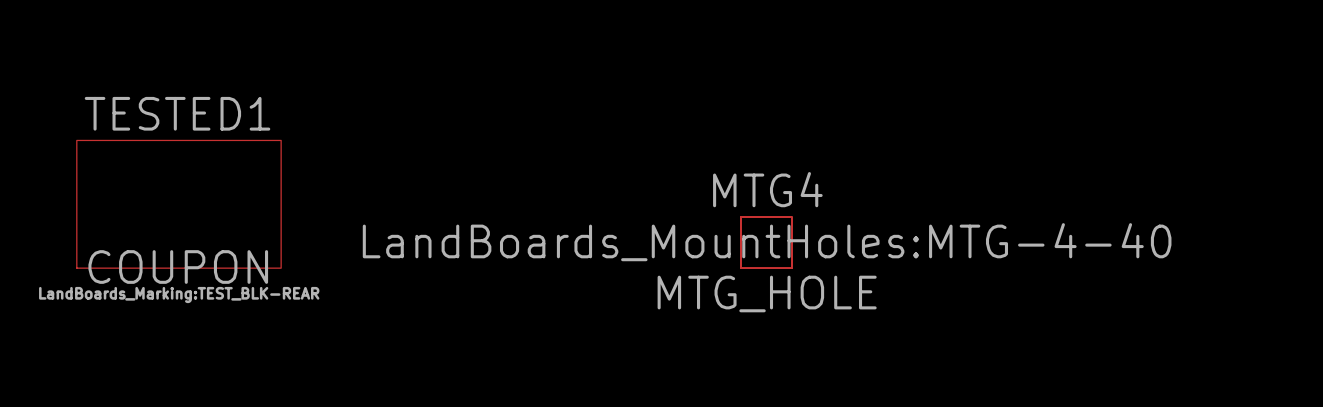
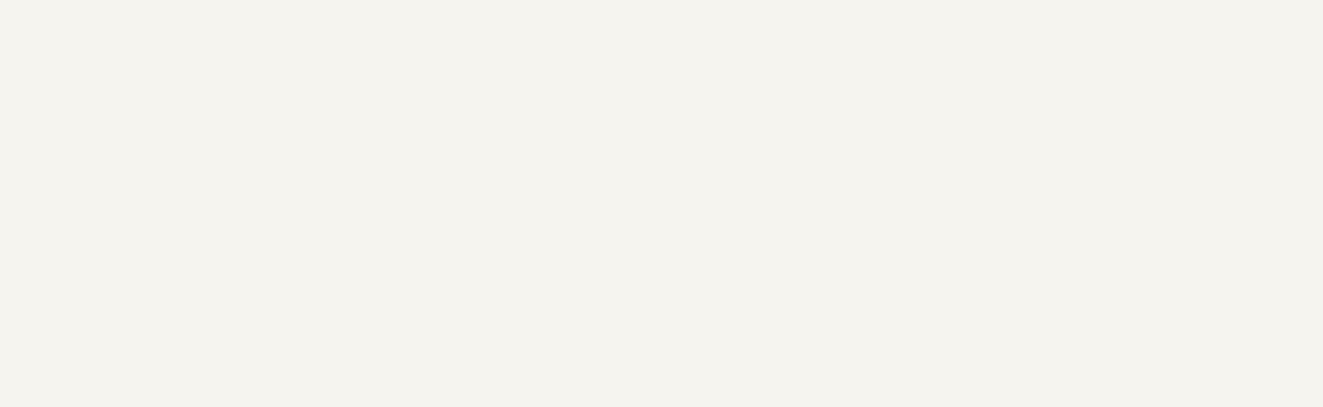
TESTED1: COUPON (178, 204) -> none
MTG4: MTG_HOLE (766, 242) -> none

